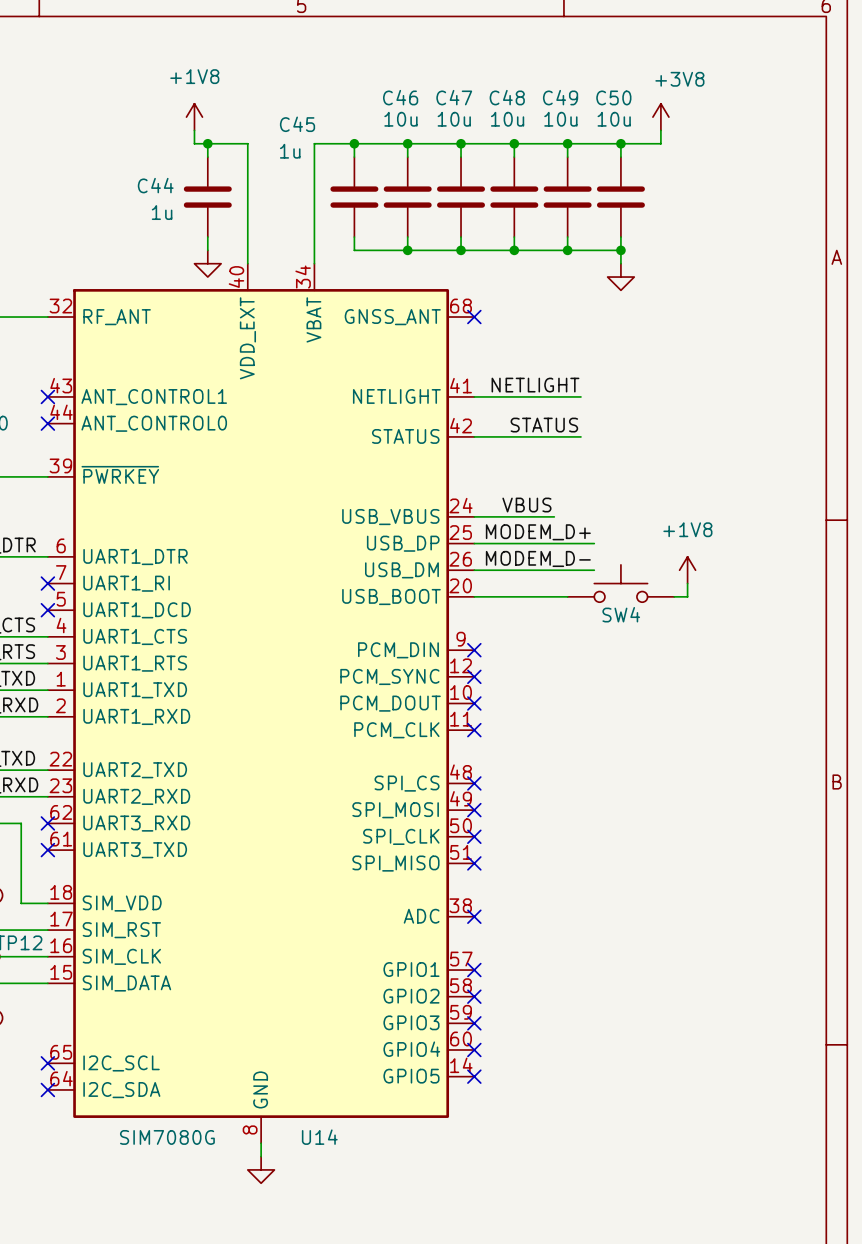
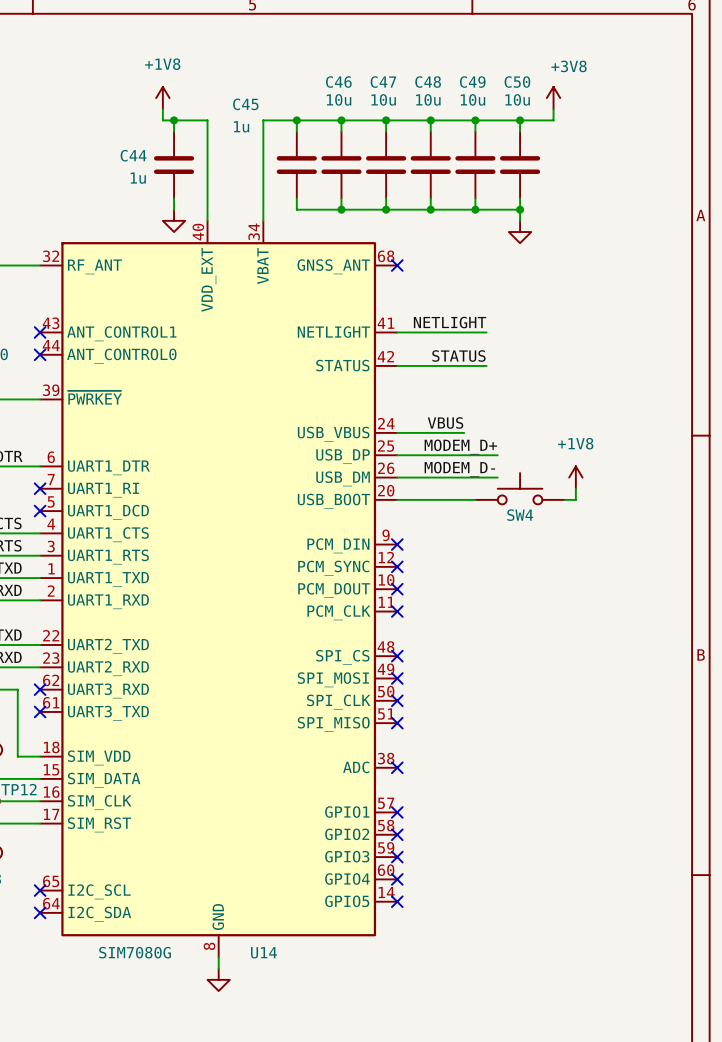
U14 pin number: 17 (61, 919) -> 15 (51, 769)
U14 pin name: SIM_RST (121, 930) -> SIM_DATA (104, 780)
U14 pin number: 15 (61, 972) -> 17 (51, 814)
U14 pin name: SIM_DATA (126, 983) -> SIM_RST (99, 824)

